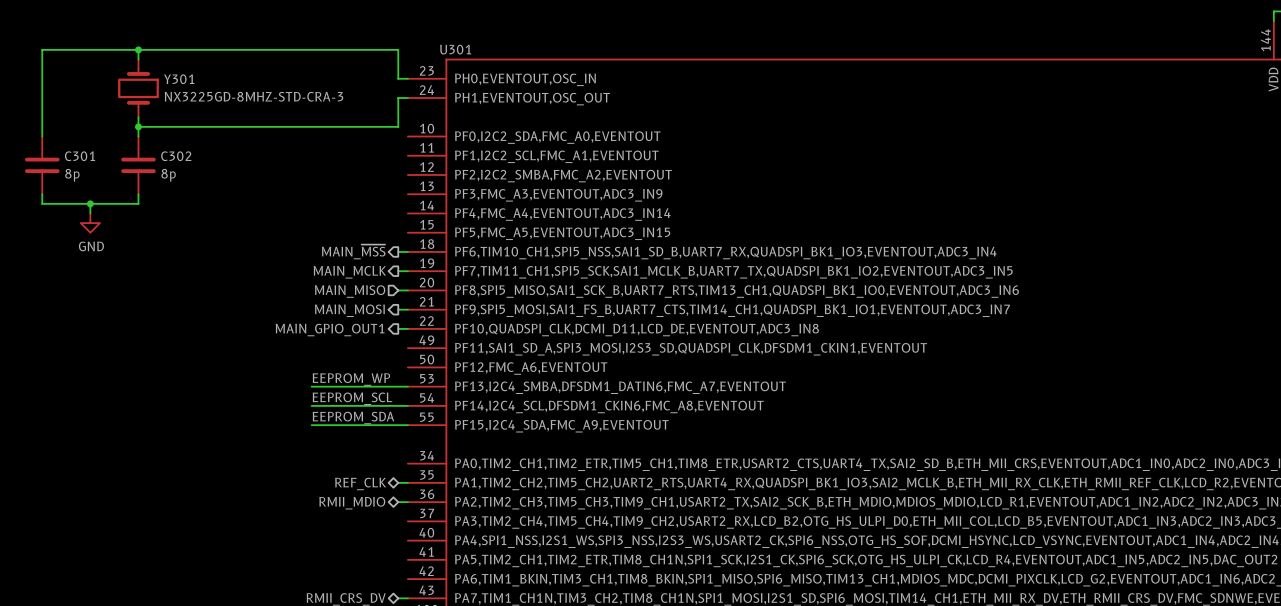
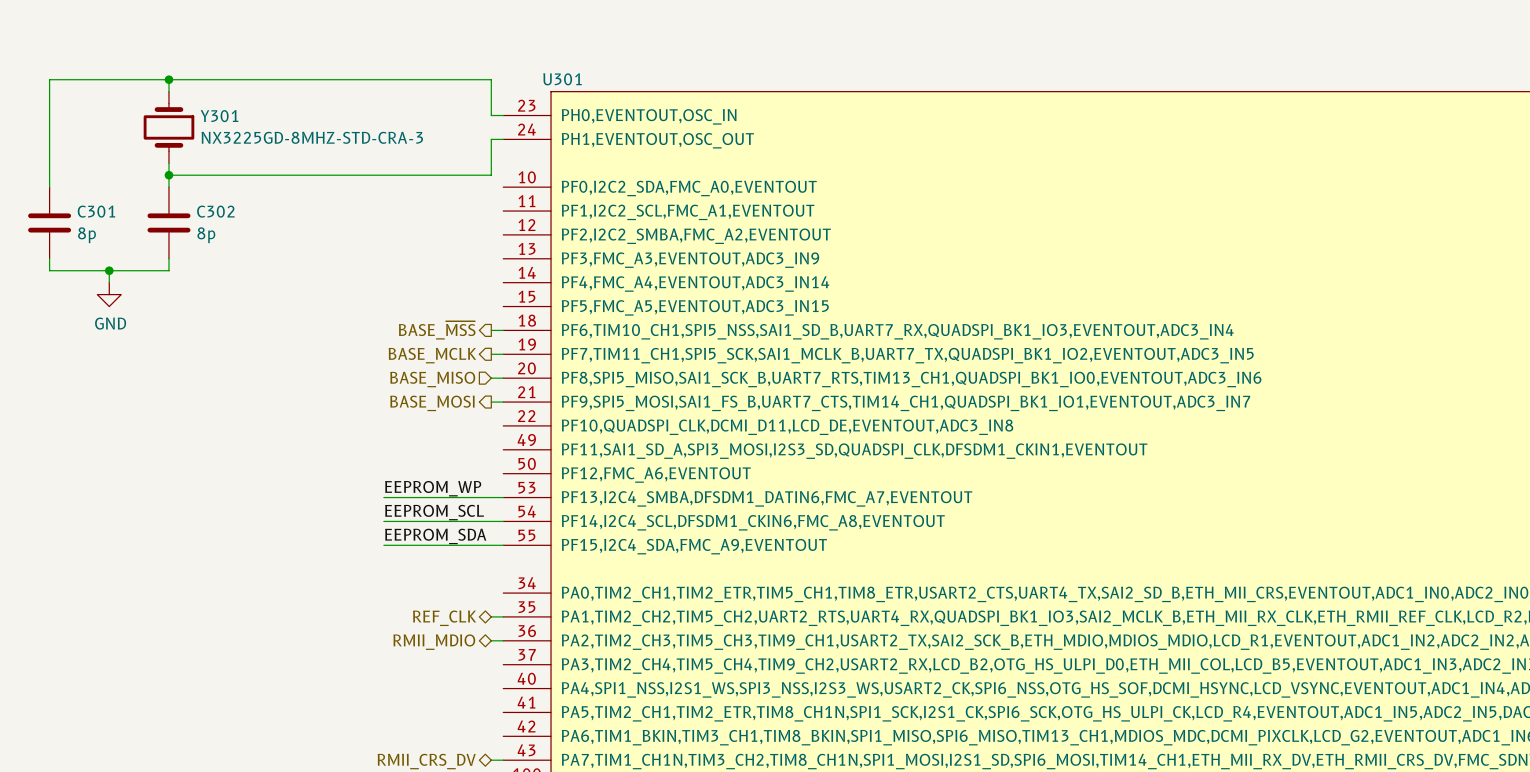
hierarchical label: MAIN_~{MSS} (353, 251) -> BASE_~{MSS} (437, 330)
hierarchical label: MAIN_MCLK (349, 272) -> BASE_MCLK (432, 355)
hierarchical label: MAIN_MISO (350, 291) -> BASE_MISO (432, 379)
hierarchical label: MAIN_MOSI (349, 310) -> BASE_MOSI (432, 403)
wire: (398, 328) (407, 328) -> none
hierarchical label: MAIN_GPIO_OUT1 (330, 330) -> none

